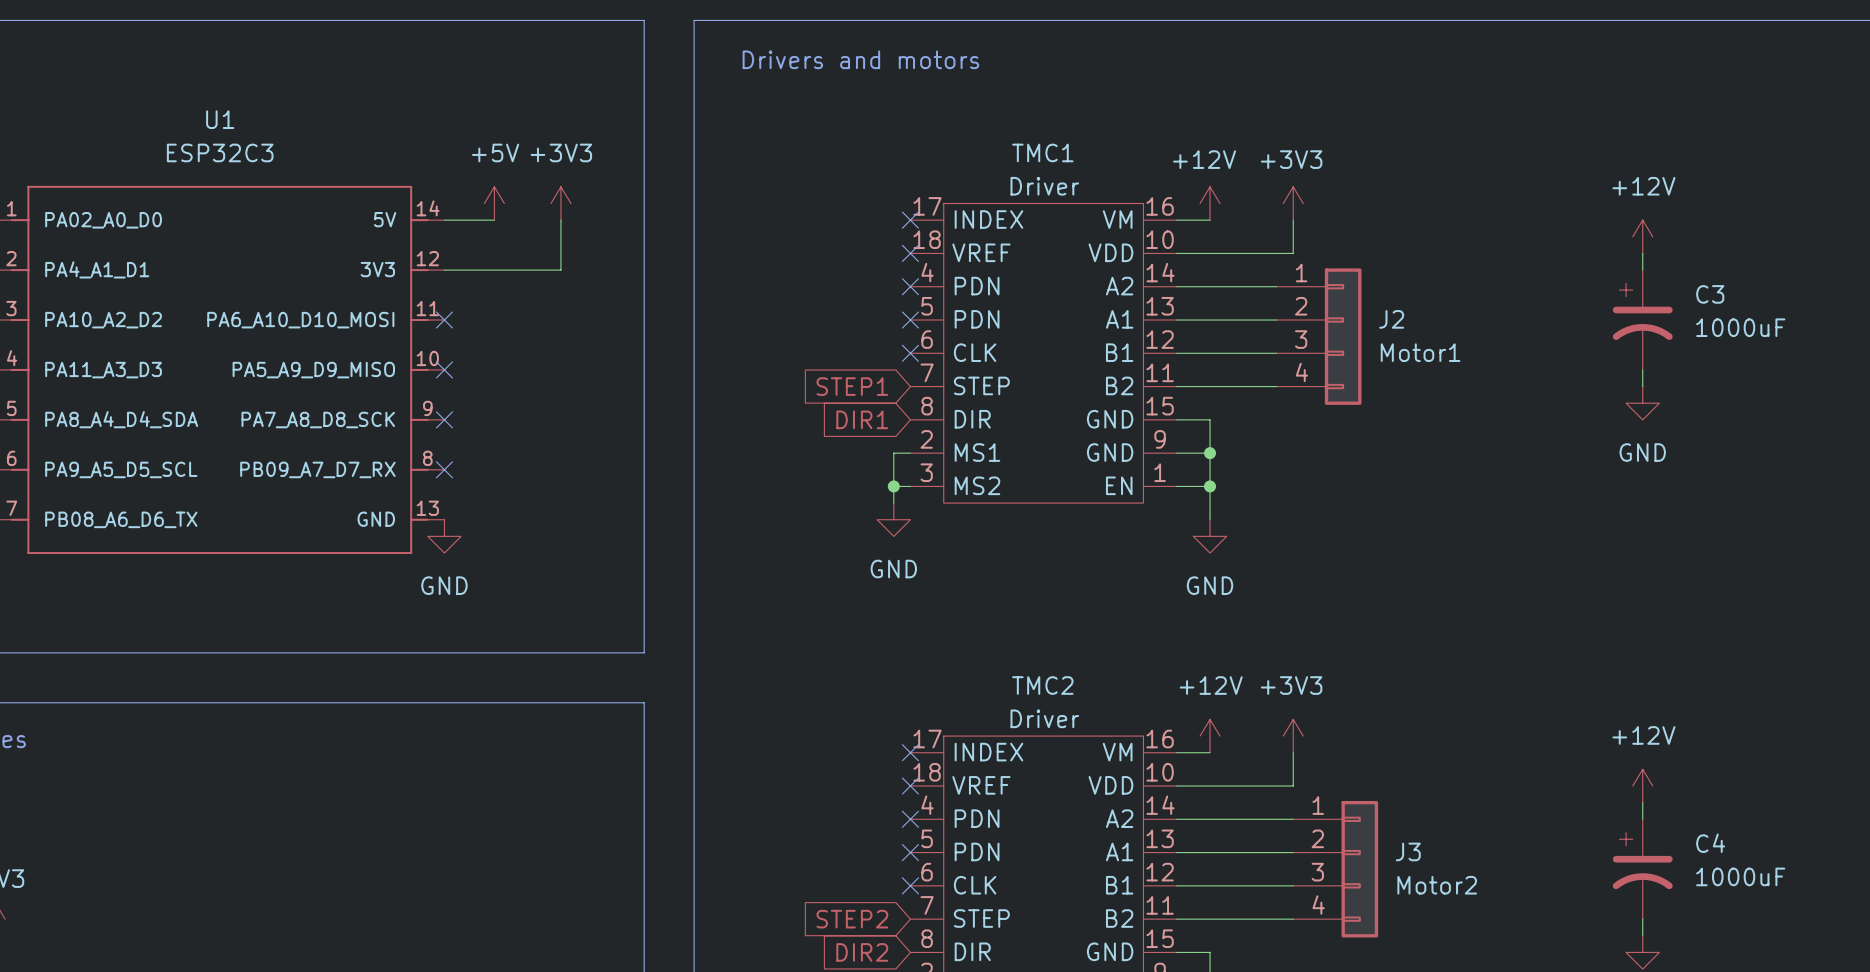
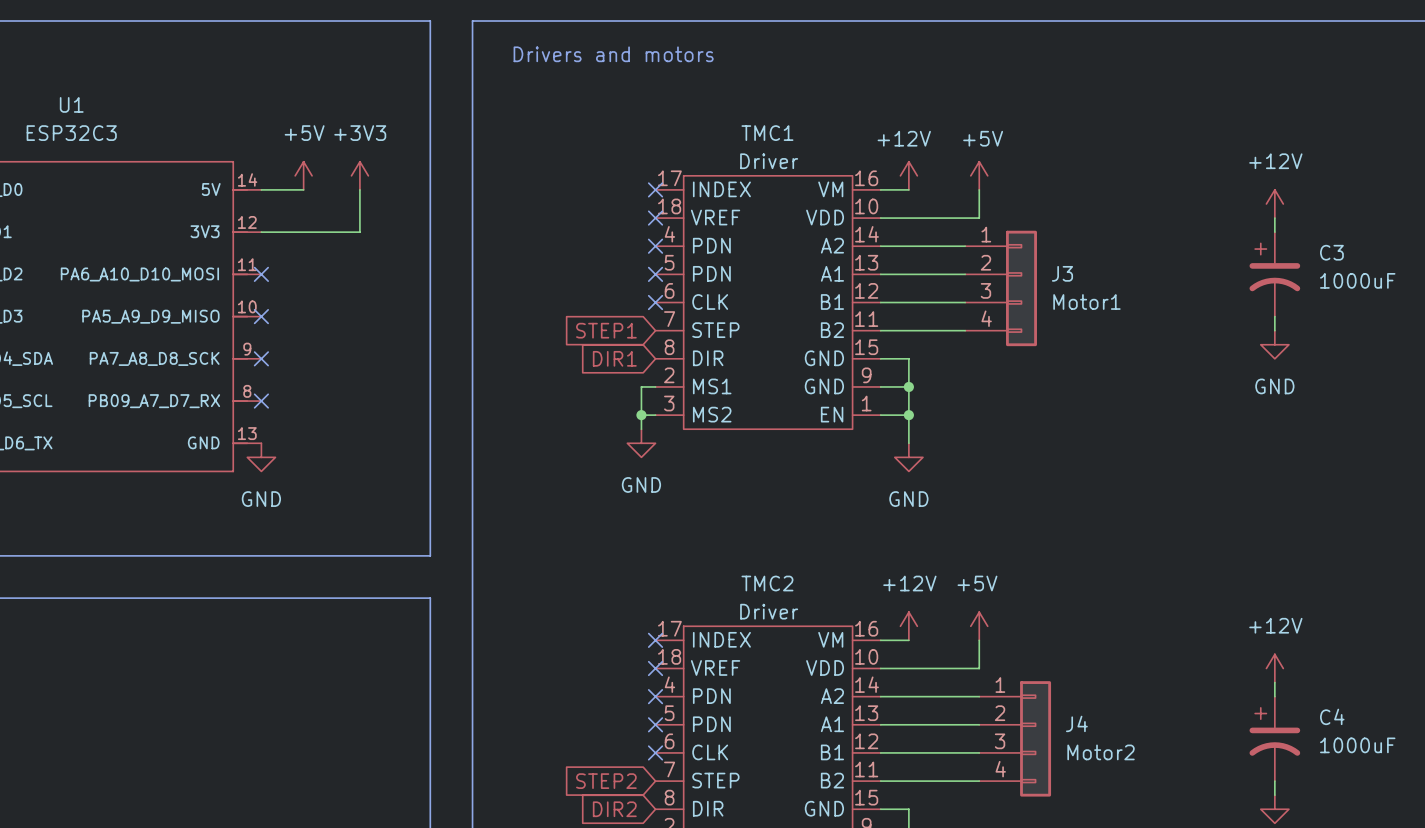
power symbol: +3V3 (1293, 203) -> +5V (979, 175)
J2 name: J2 (1391, 319) -> J3 (1062, 273)
power symbol: +3V3 (1293, 736) -> +5V (979, 626)
J3 name: J3 (1408, 851) -> J4 (1076, 723)

